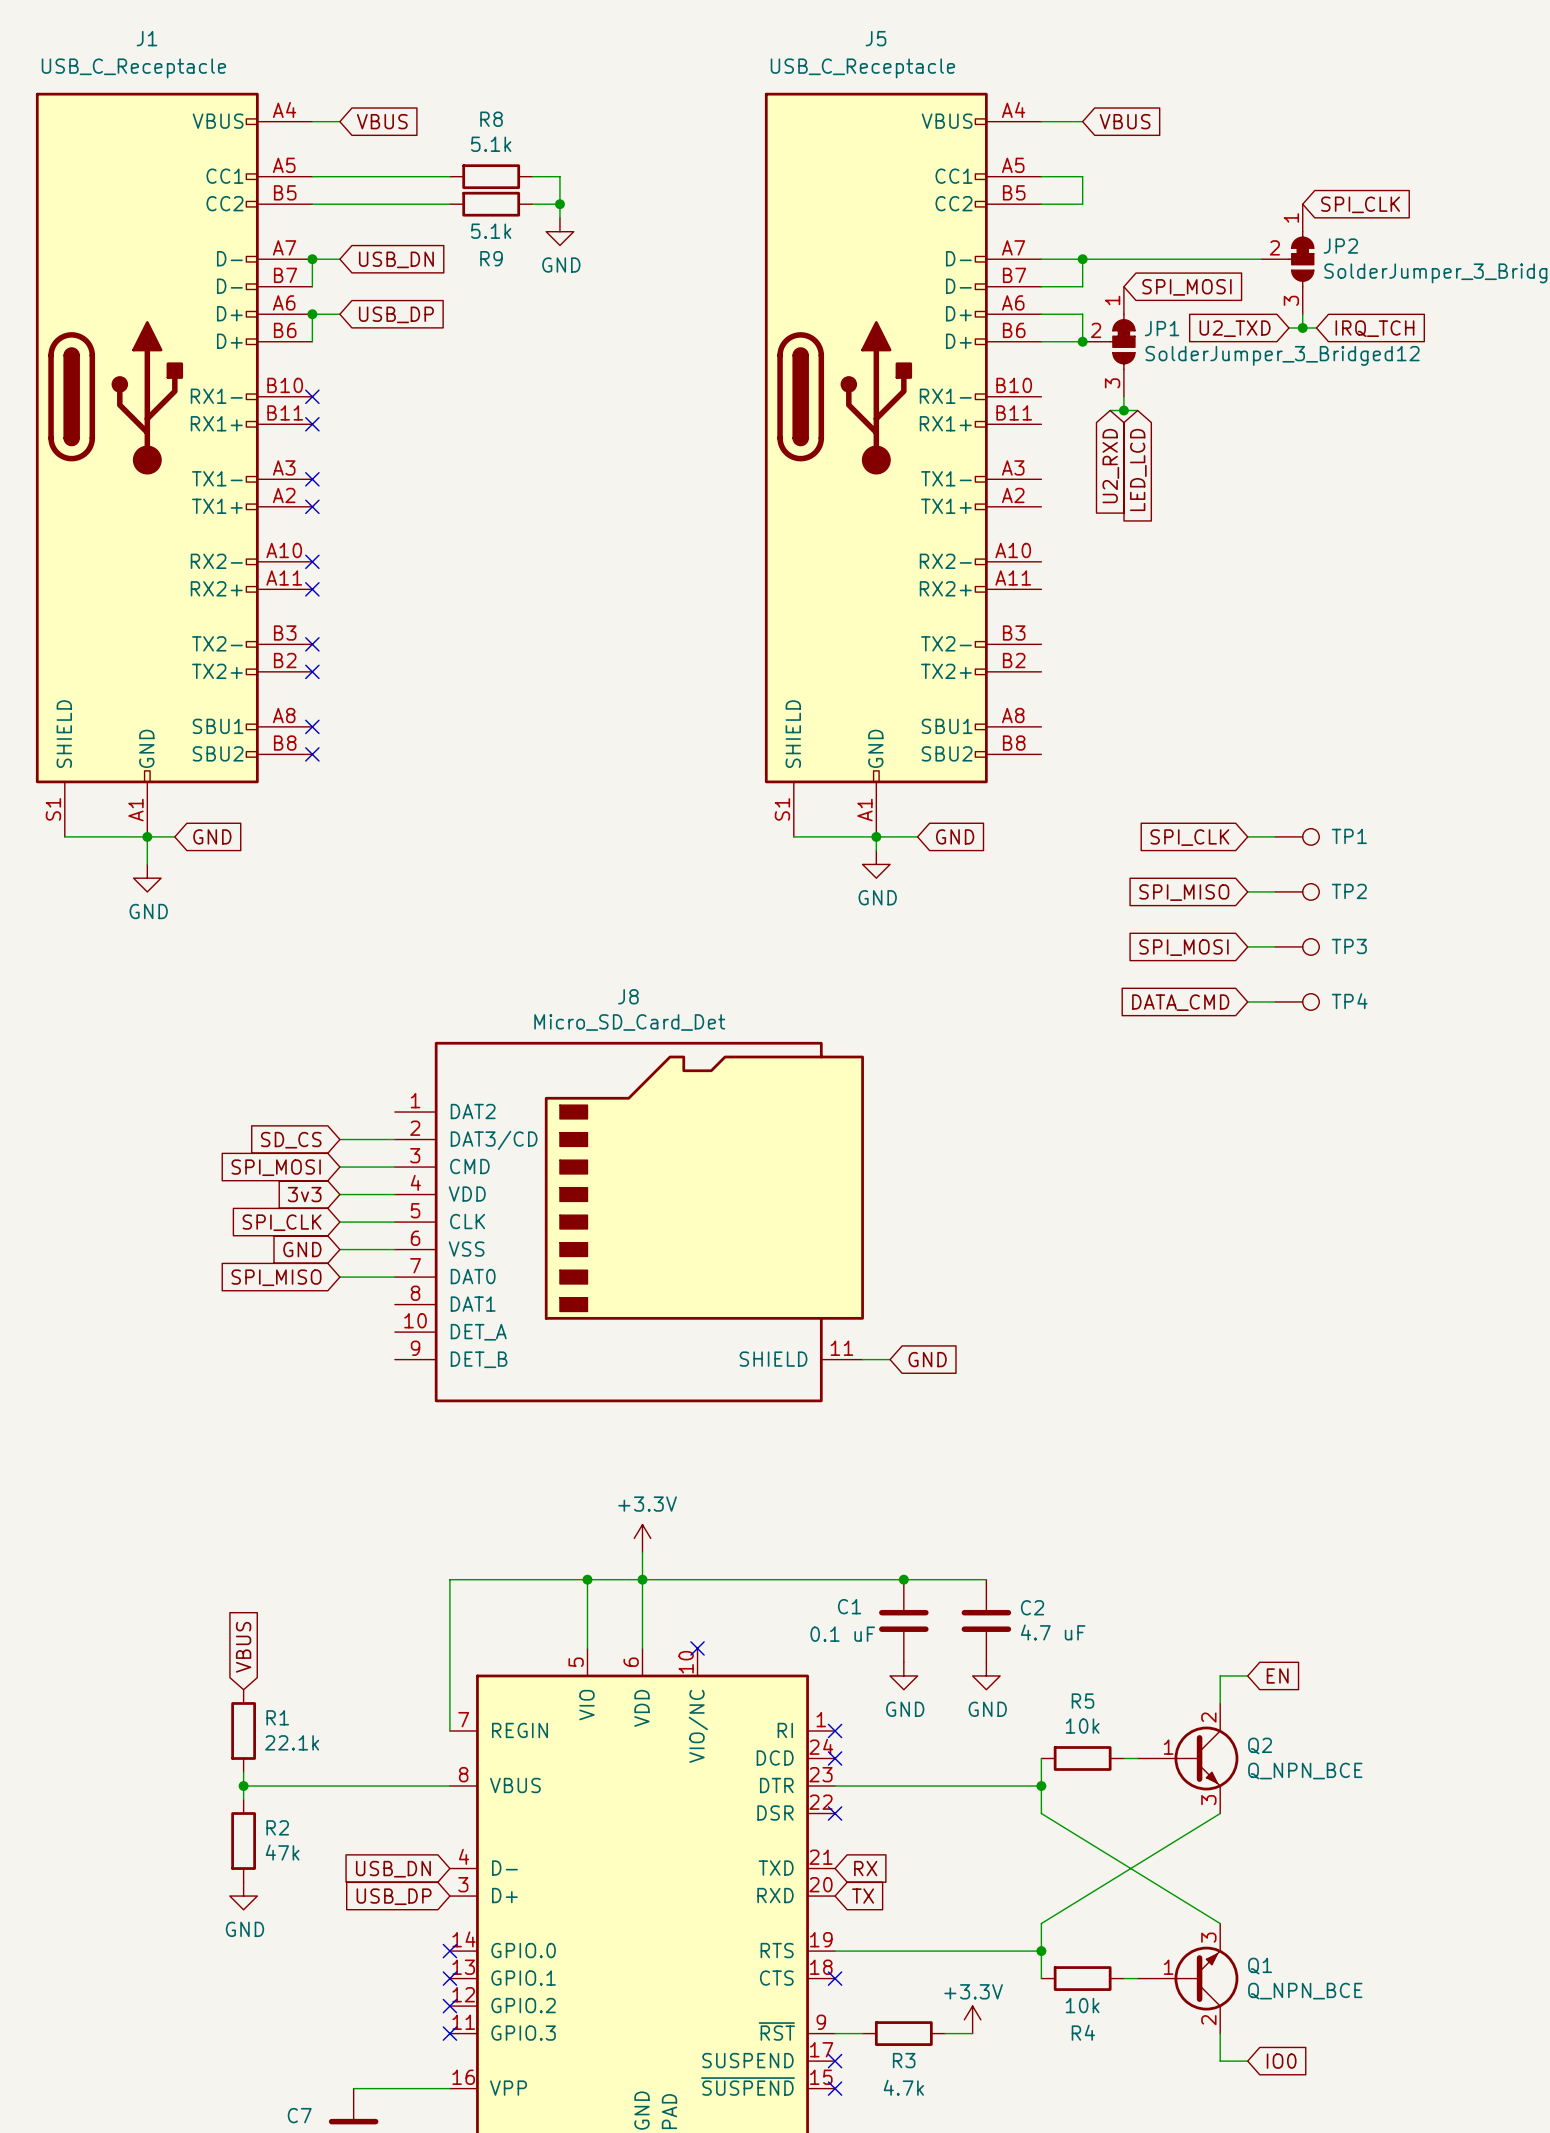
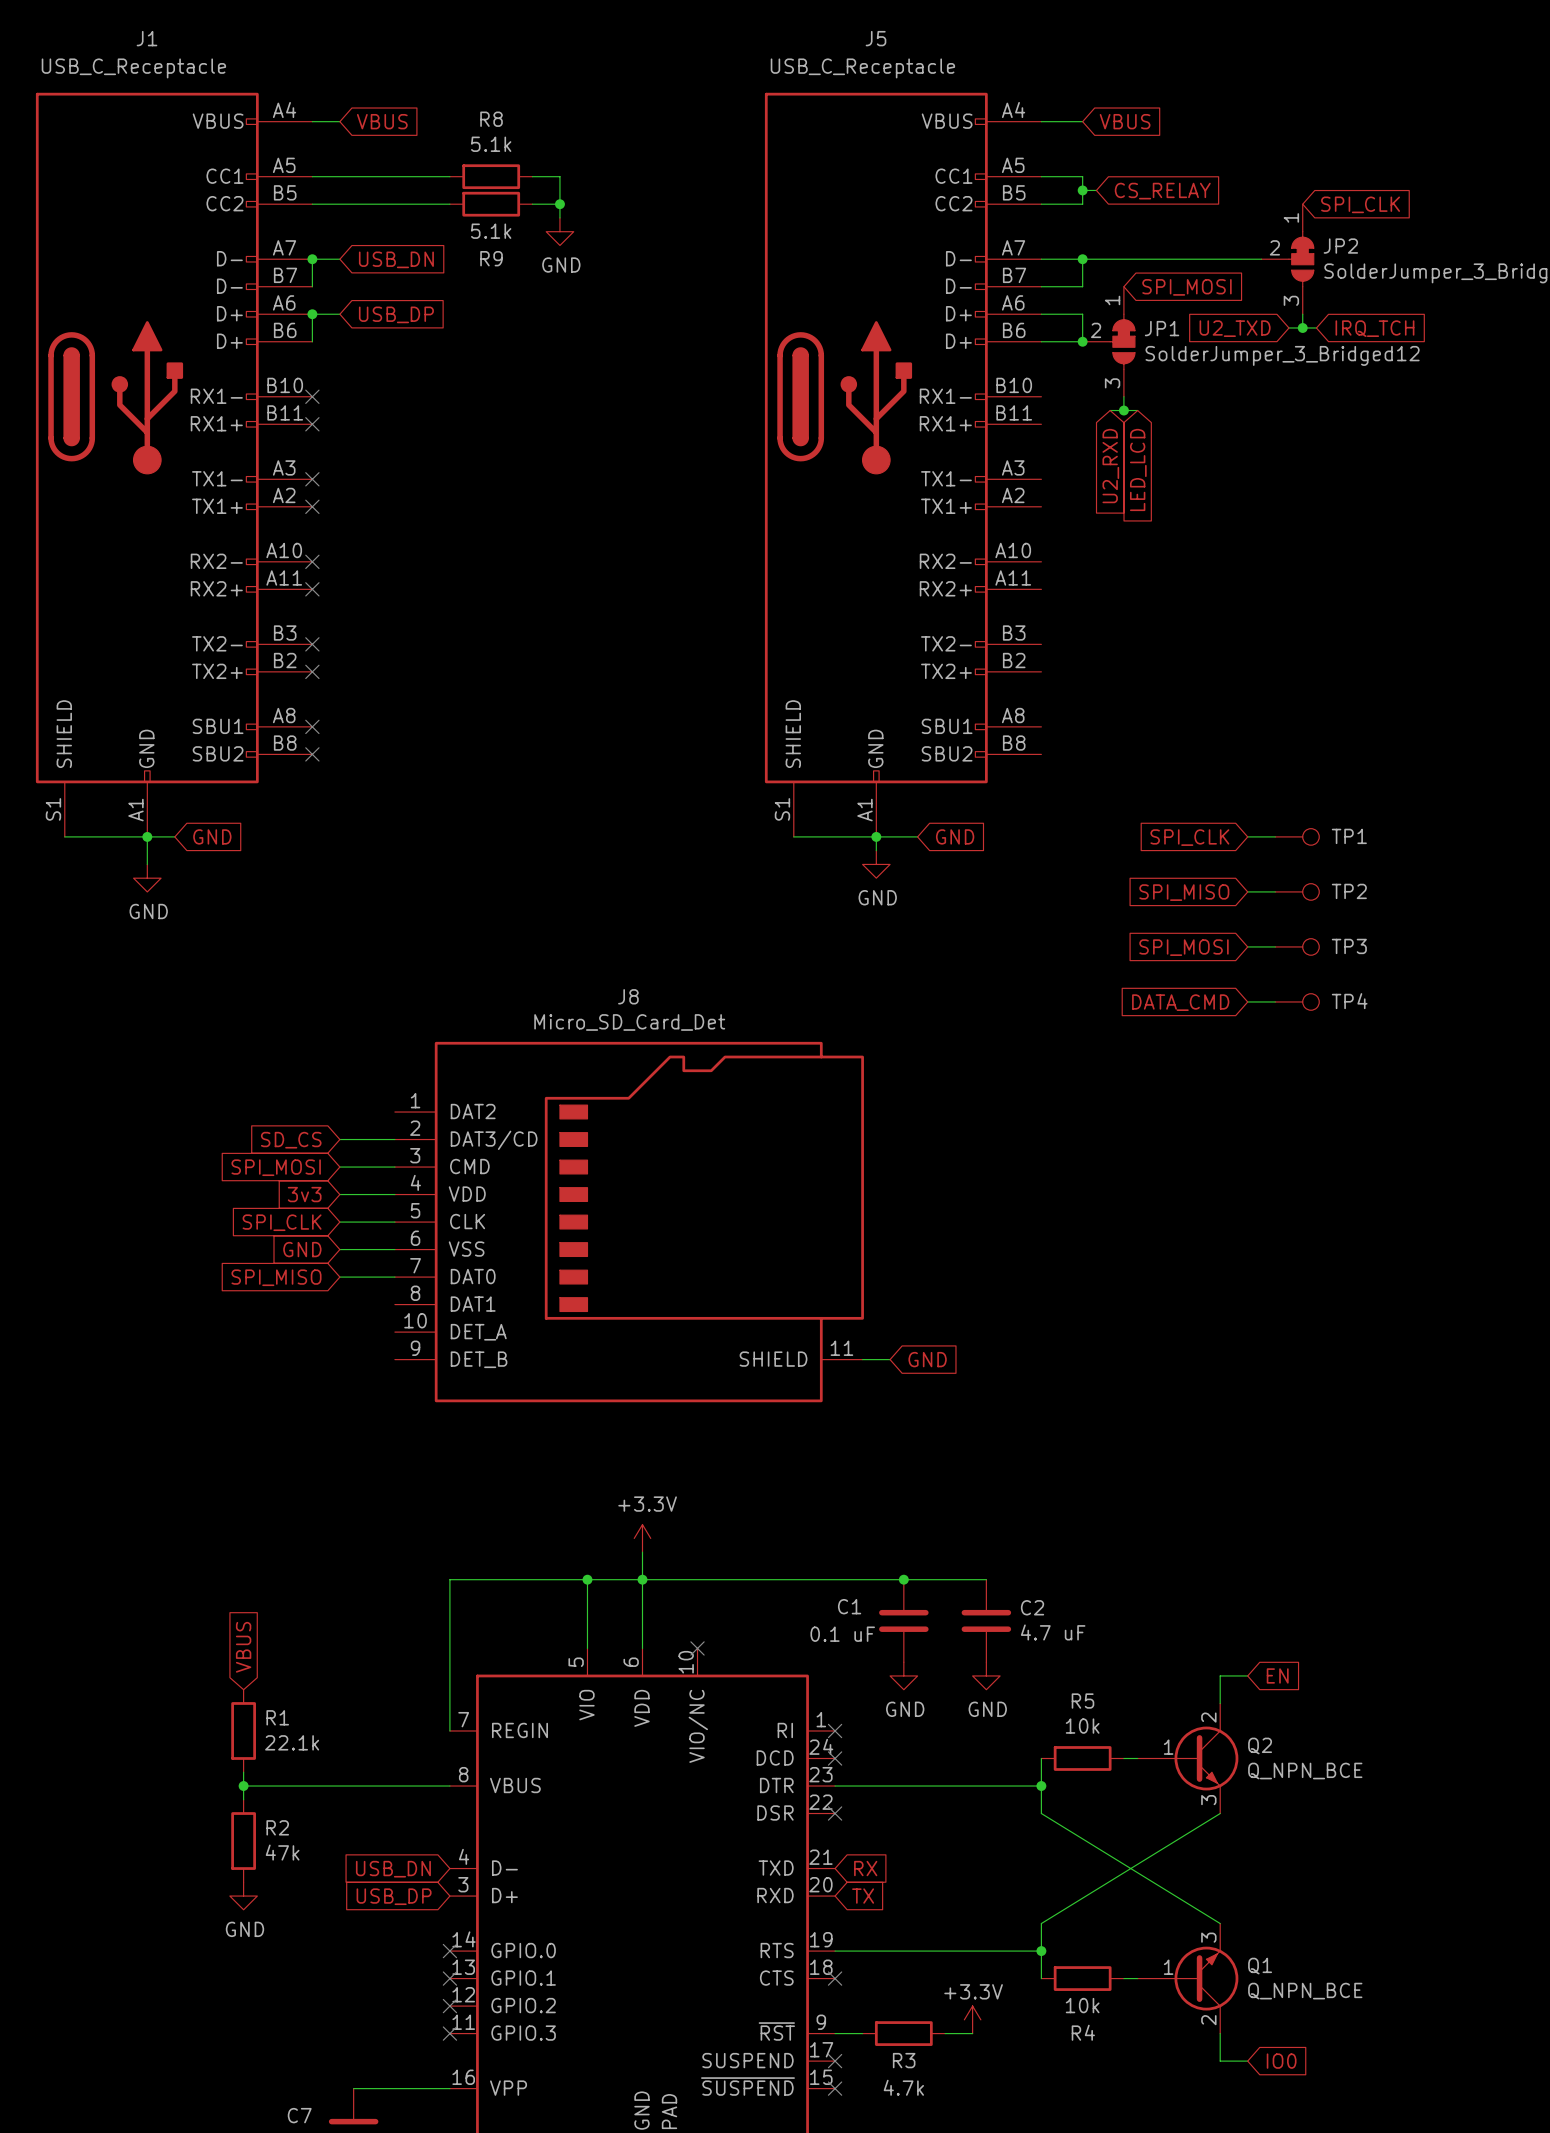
wire: none -> (1082, 190) (1096, 190)
junction: none -> (1082, 190)
global label: none -> CS_RELAY (1162, 191)

